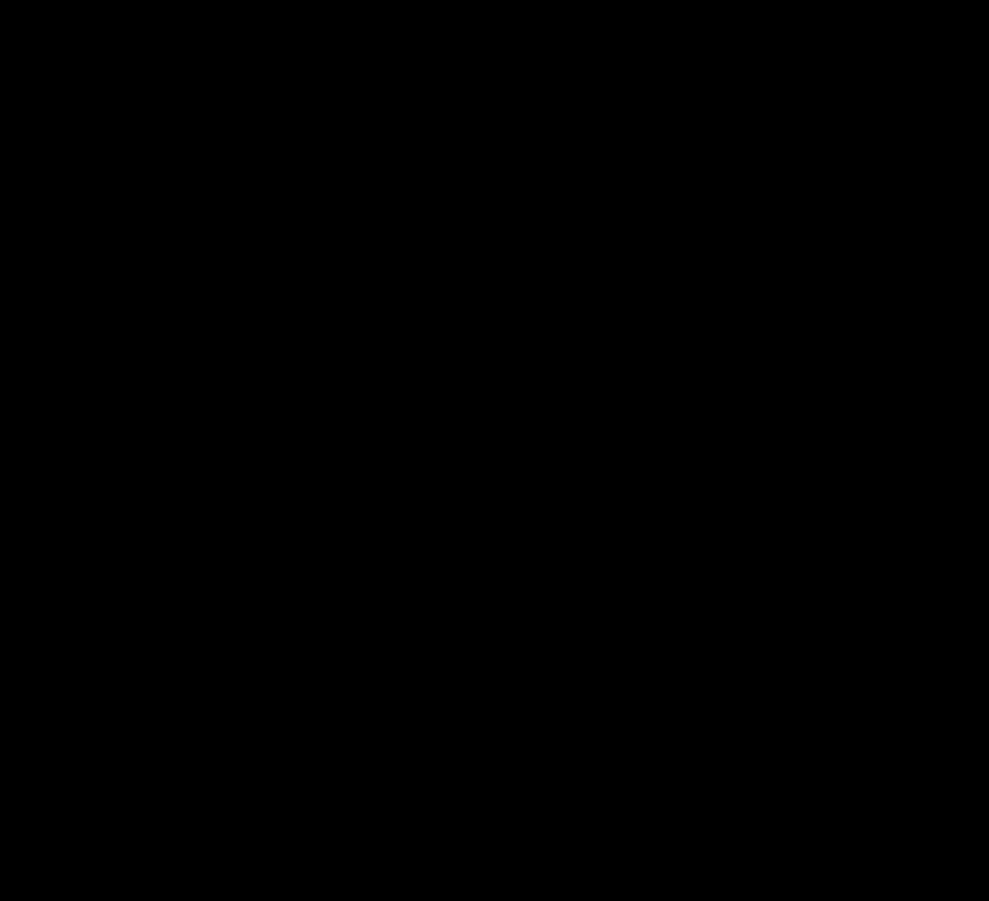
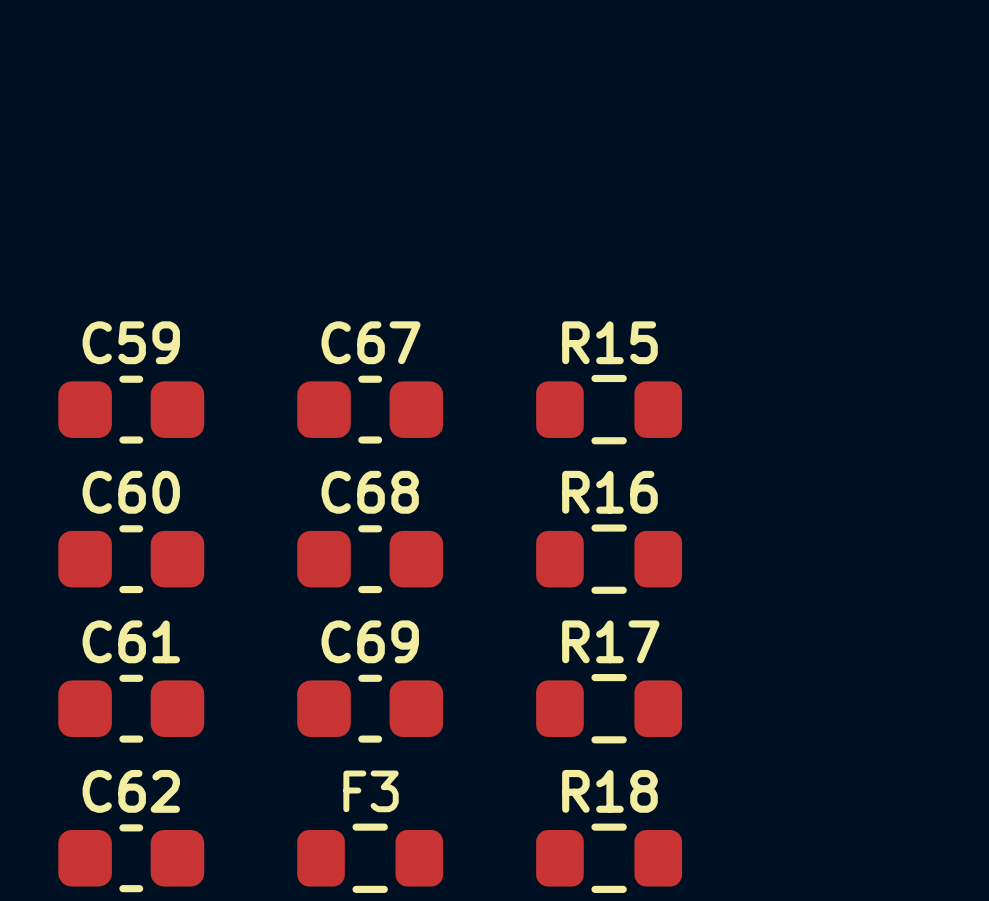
C59: none -> (131, 409)
C67: none -> (370, 409)
R15: none -> (609, 409)
C60: none -> (131, 559)
C68: none -> (370, 559)
R16: none -> (609, 559)
C61: none -> (131, 708)
C69: none -> (370, 708)
R17: none -> (609, 708)
C62: none -> (131, 858)
F3: none -> (370, 858)
R18: none -> (609, 858)

